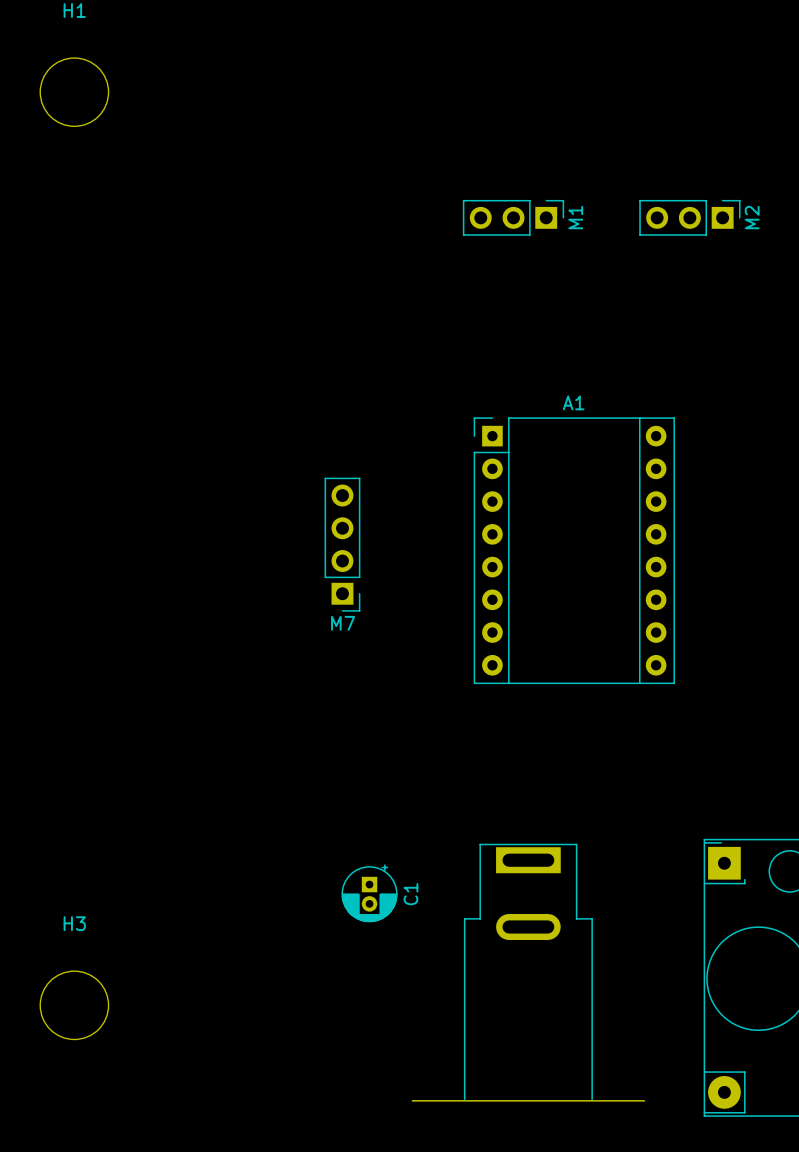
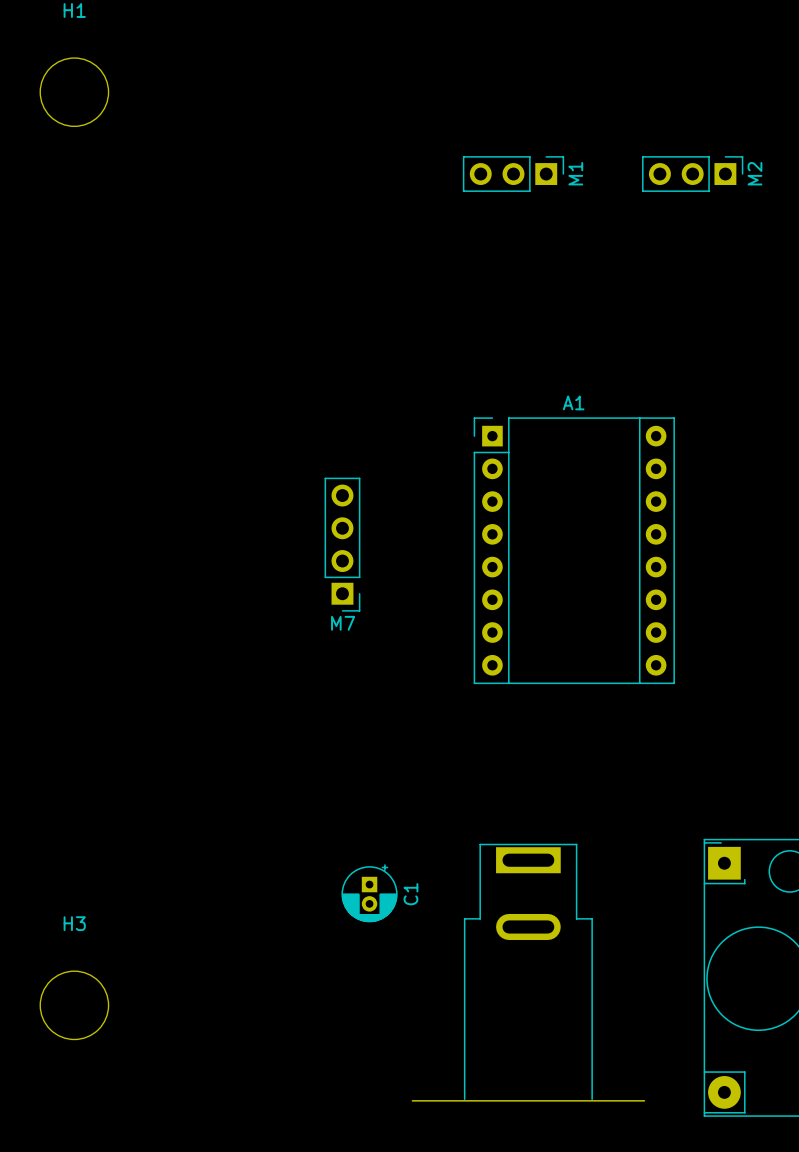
M1 position: (513, 217) -> (513, 174)
M2 position: (689, 217) -> (692, 174)

